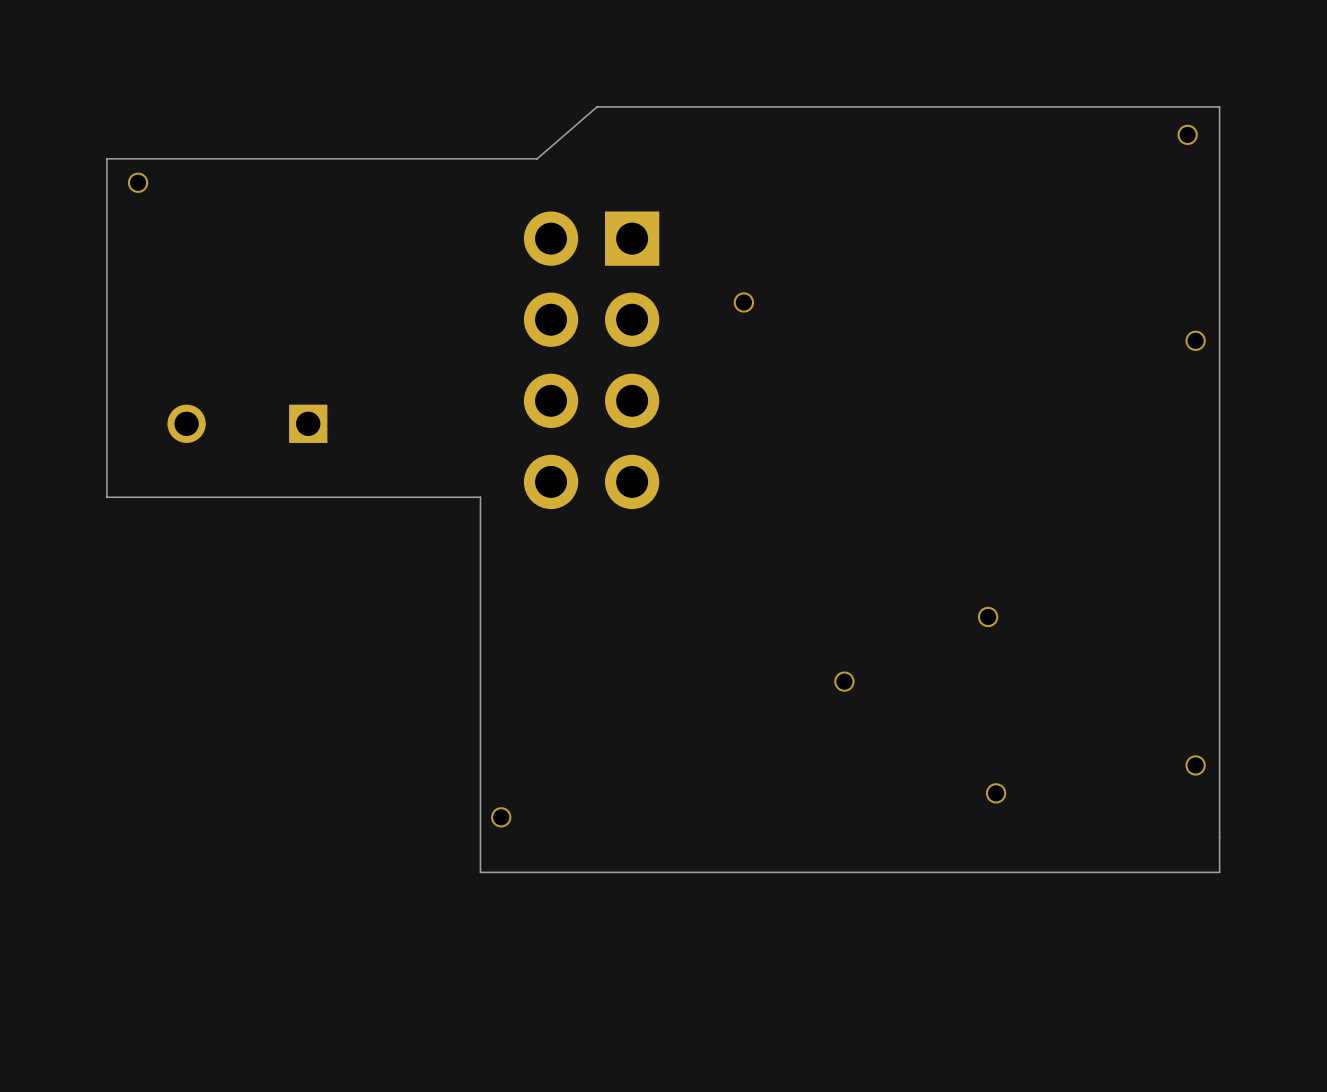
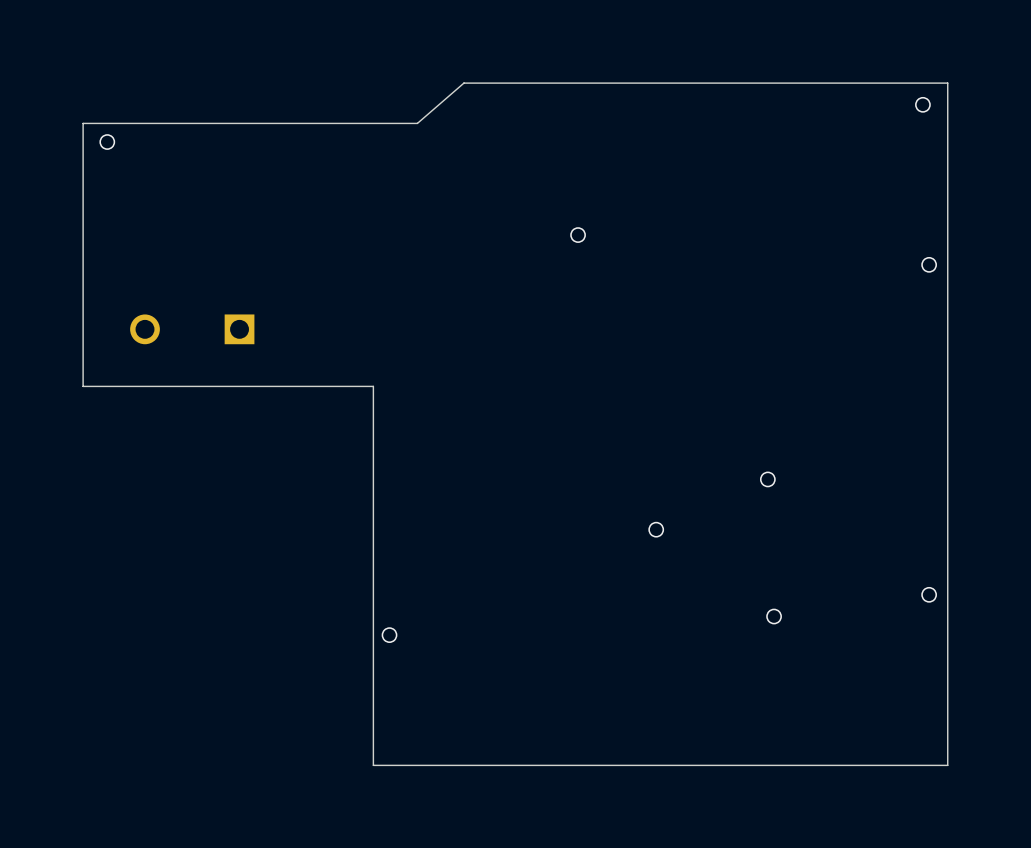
part: (591, 360) -> none
board edge: (1219, 872) (480, 872) -> (947, 677) (947, 765) (373, 765) (373, 677)

